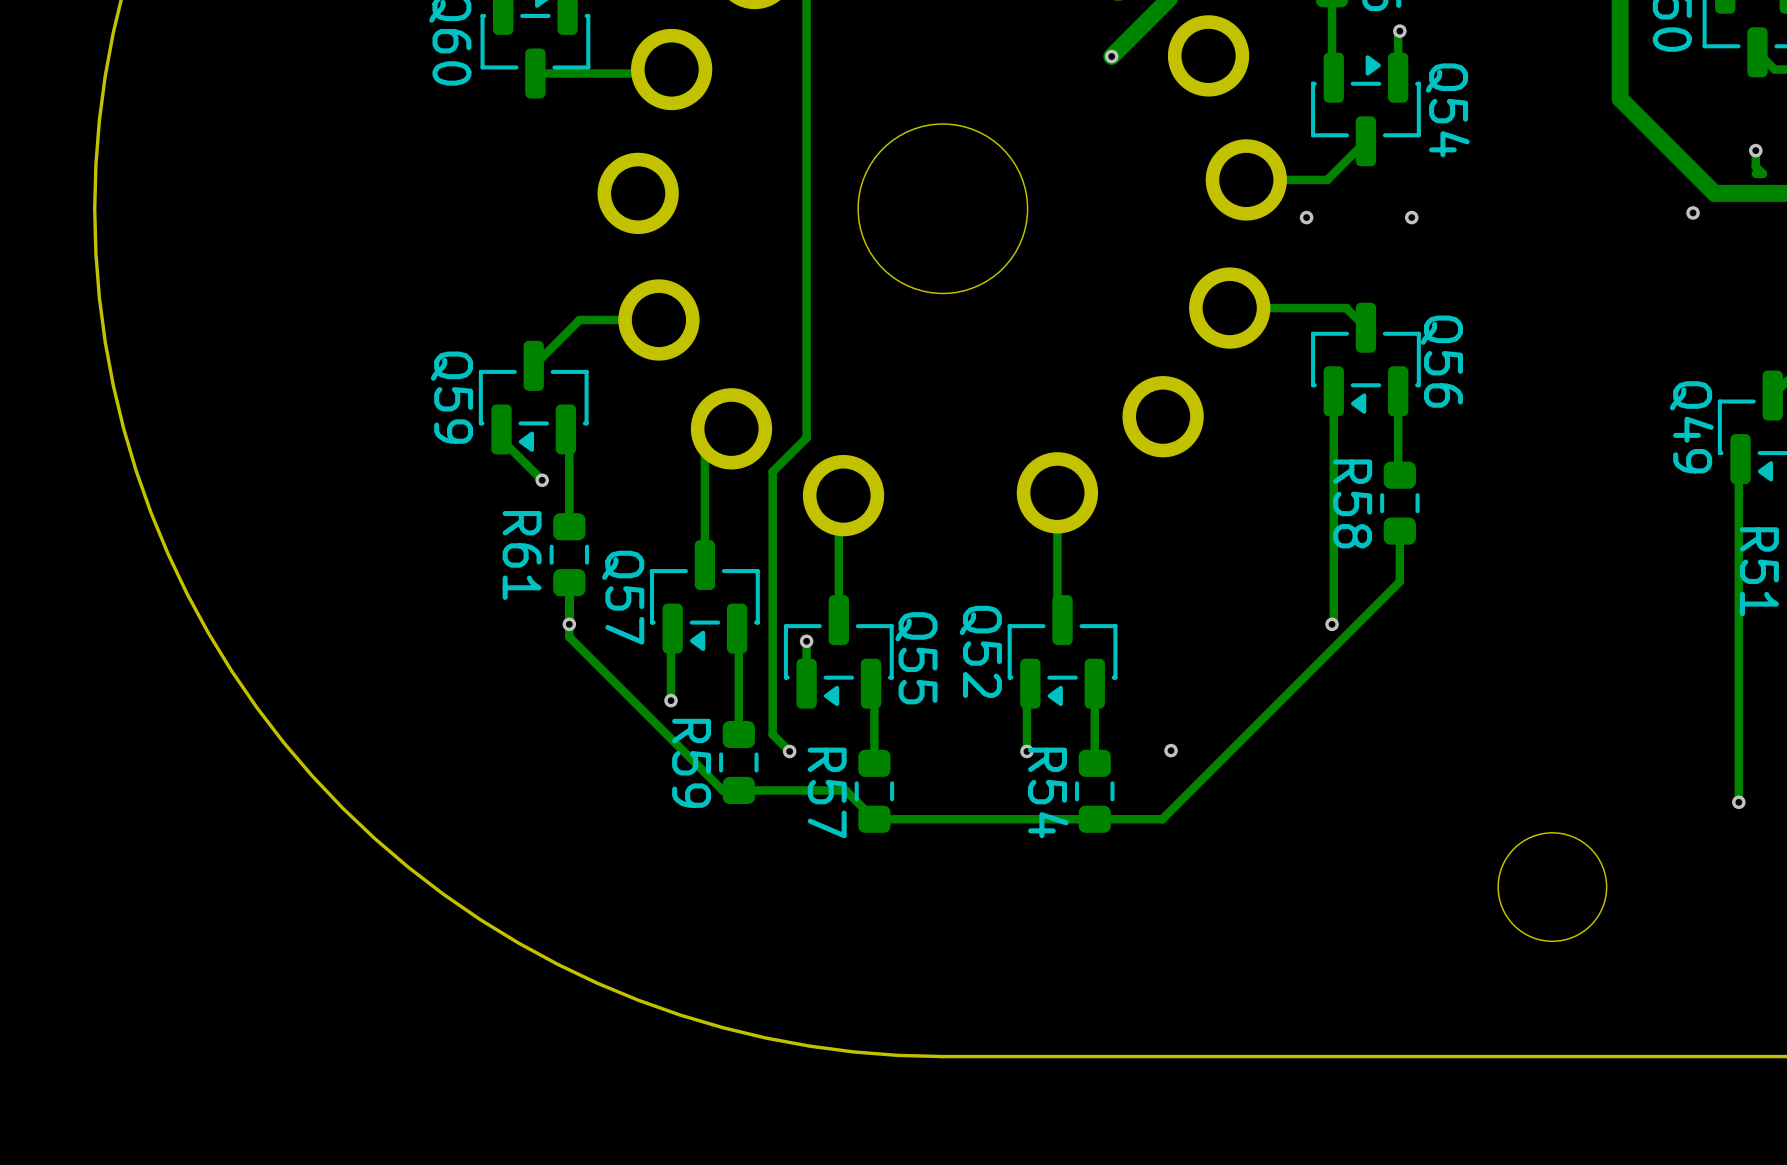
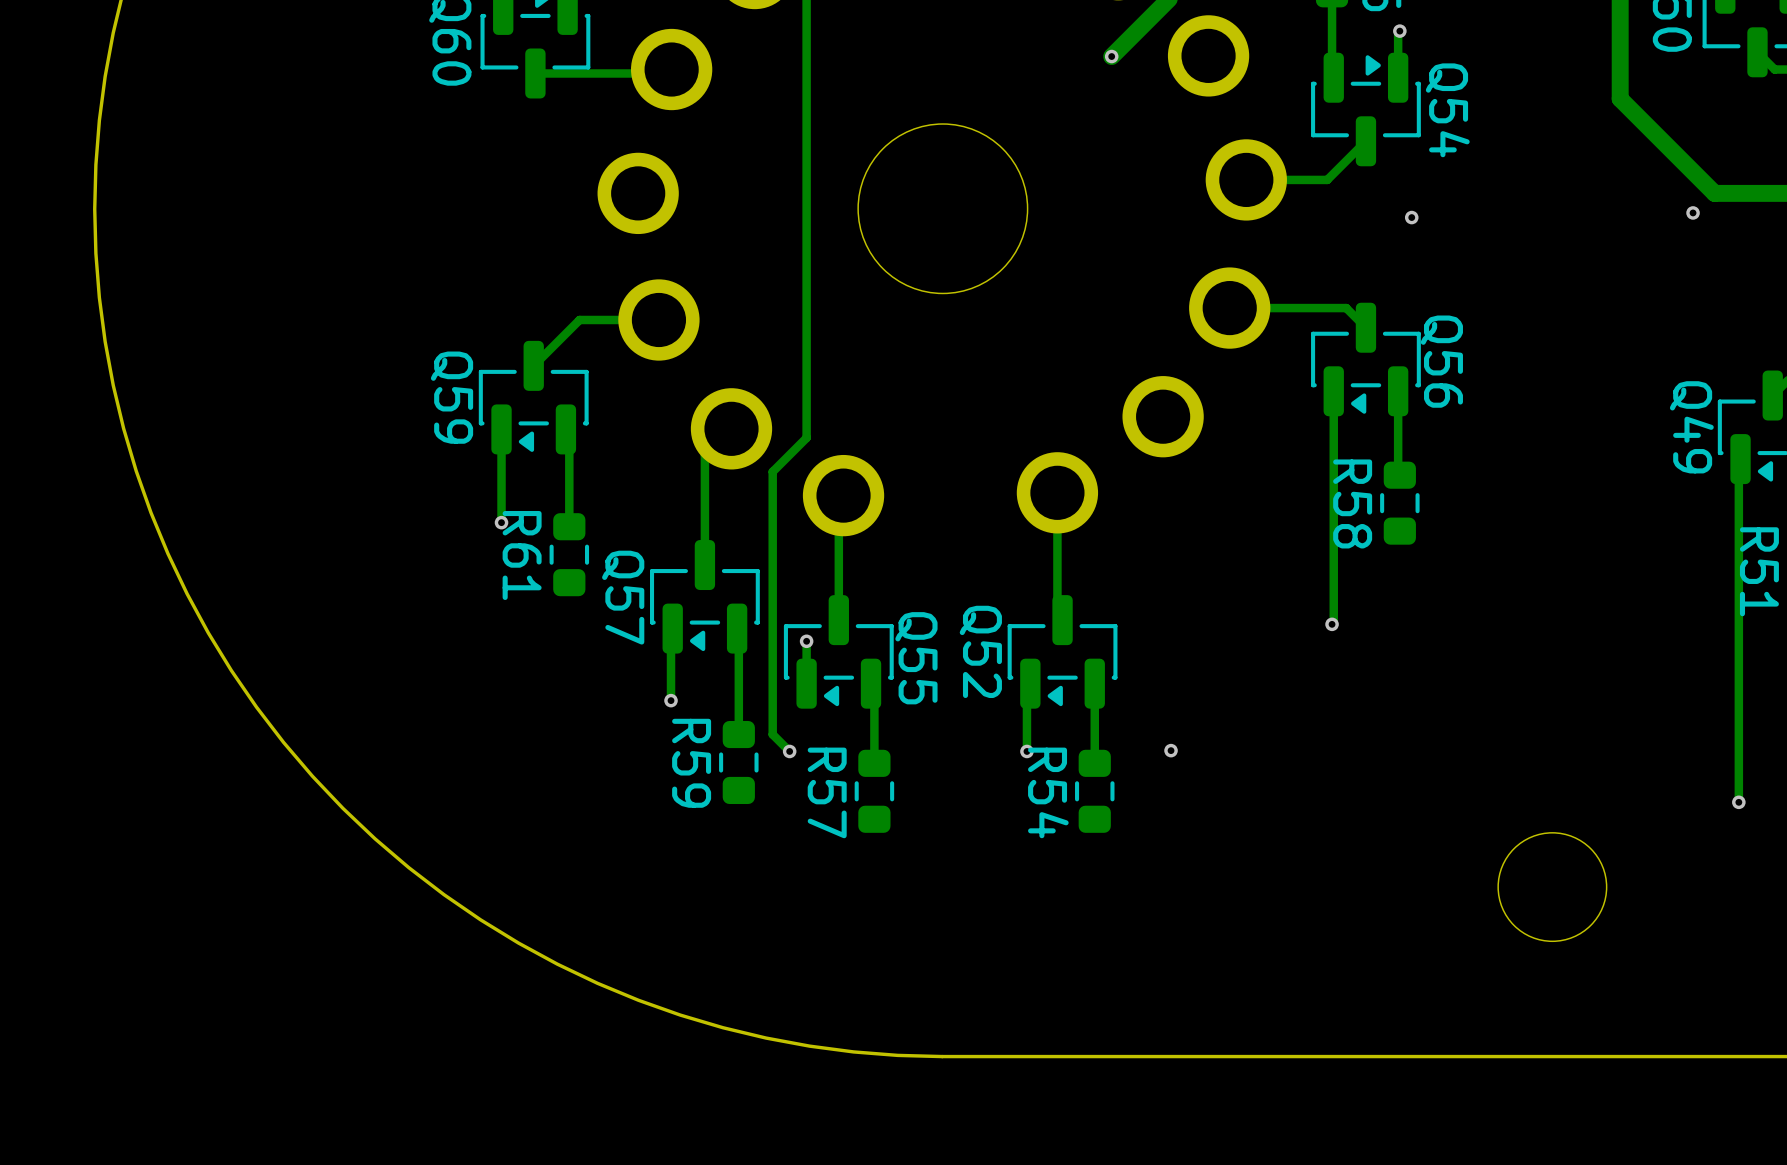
track: (1755, 150) (1755, 166) (1762, 173) (1755, 173) -> none
via: (1755, 150) -> none
via: (1306, 217) -> none
track: (501, 439) (542, 480) -> (501, 439) (501, 522)
via position: (542, 480) -> (501, 522)
track: (1399, 531) (1399, 581) (1162, 819) (874, 819) (845, 790) (722, 790) (569, 637) (569, 582) -> none
via: (569, 624) -> none

